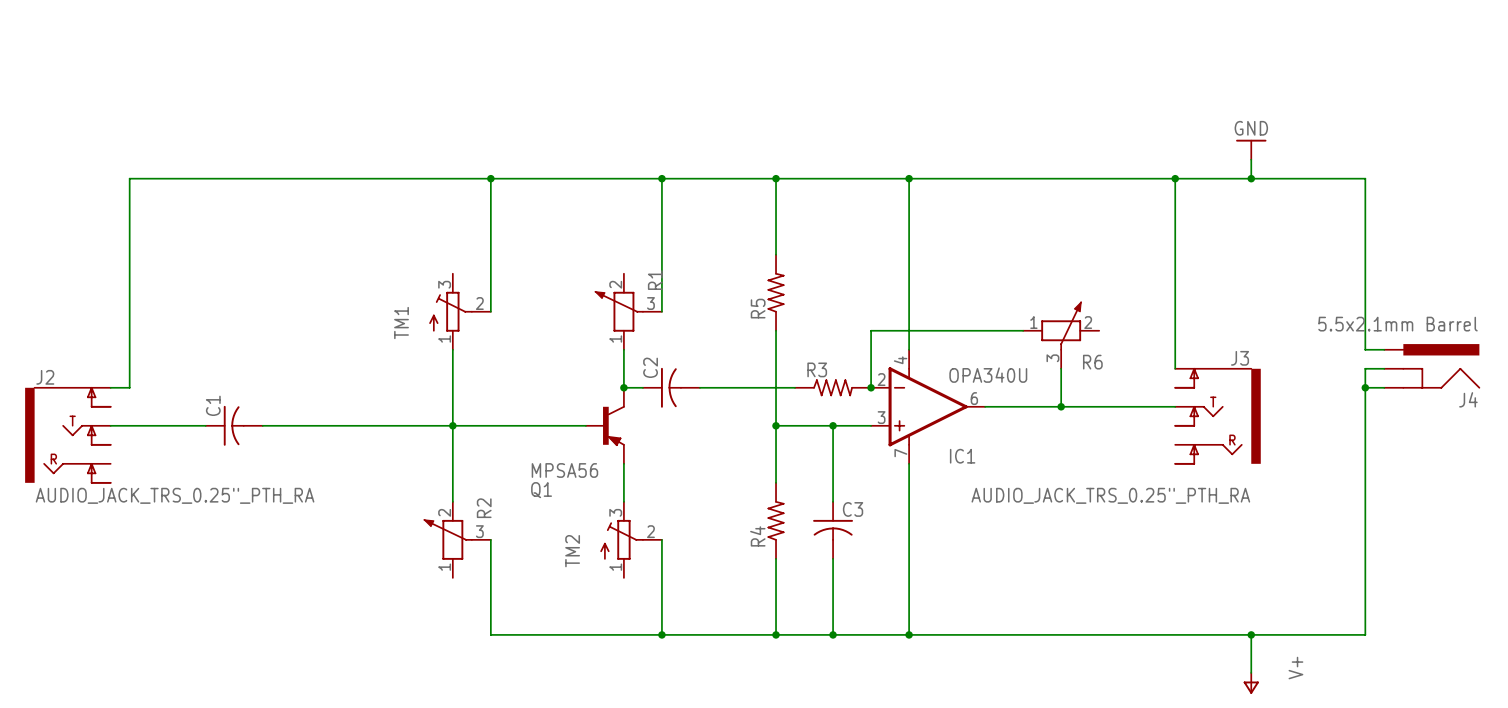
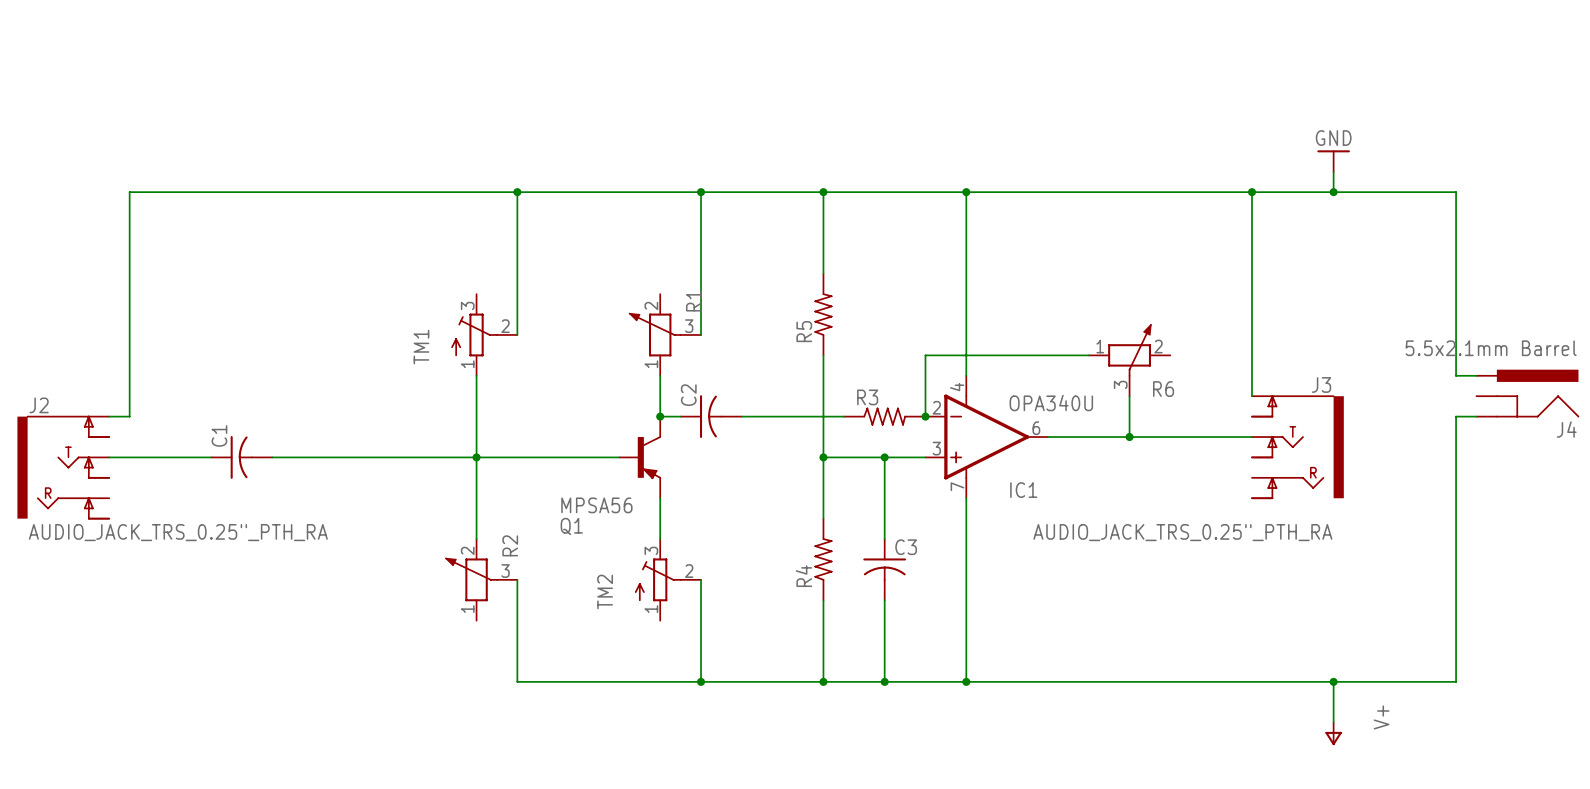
wire: (1384, 368) (1365, 368) (1365, 387) -> none
junction: (1365, 387) -> none

